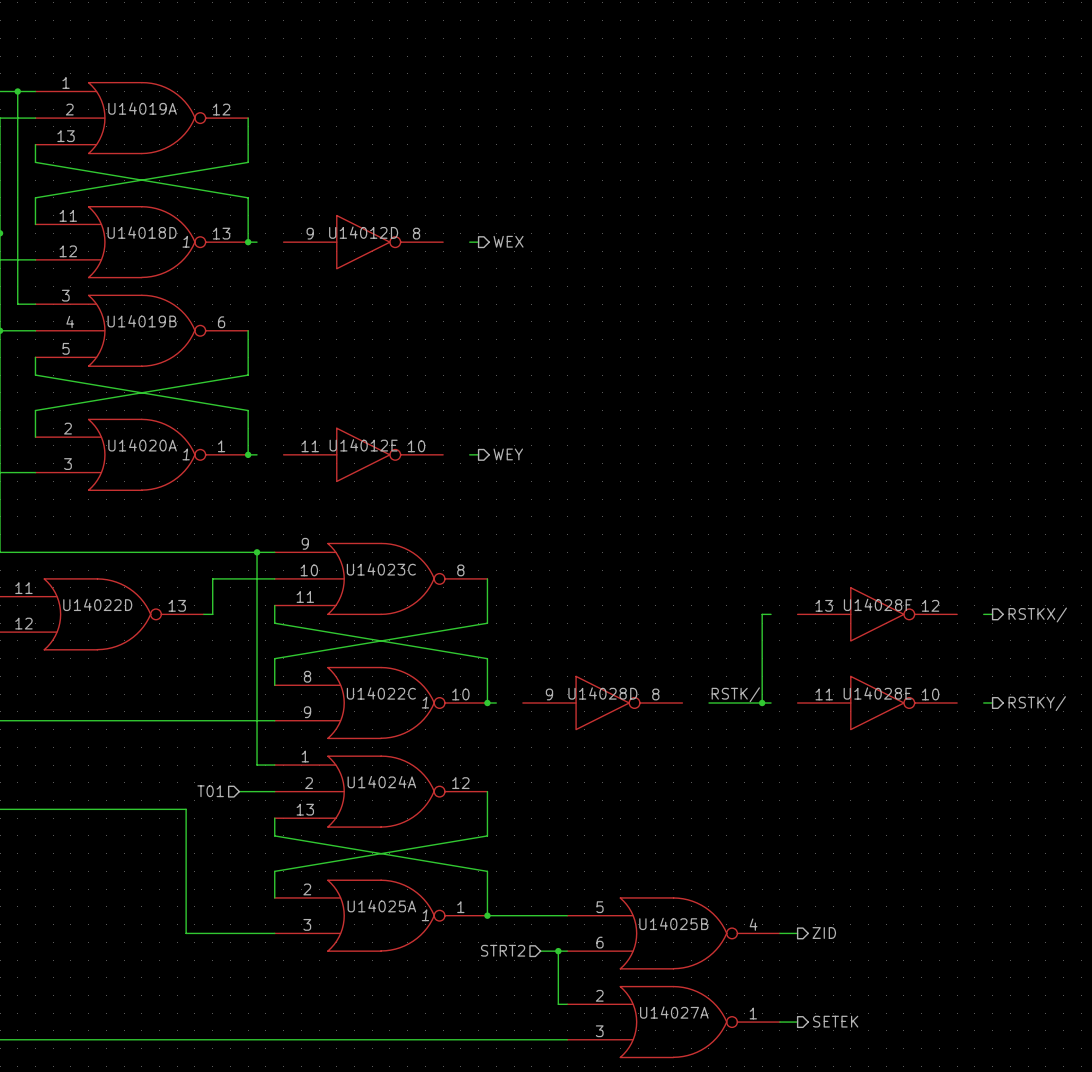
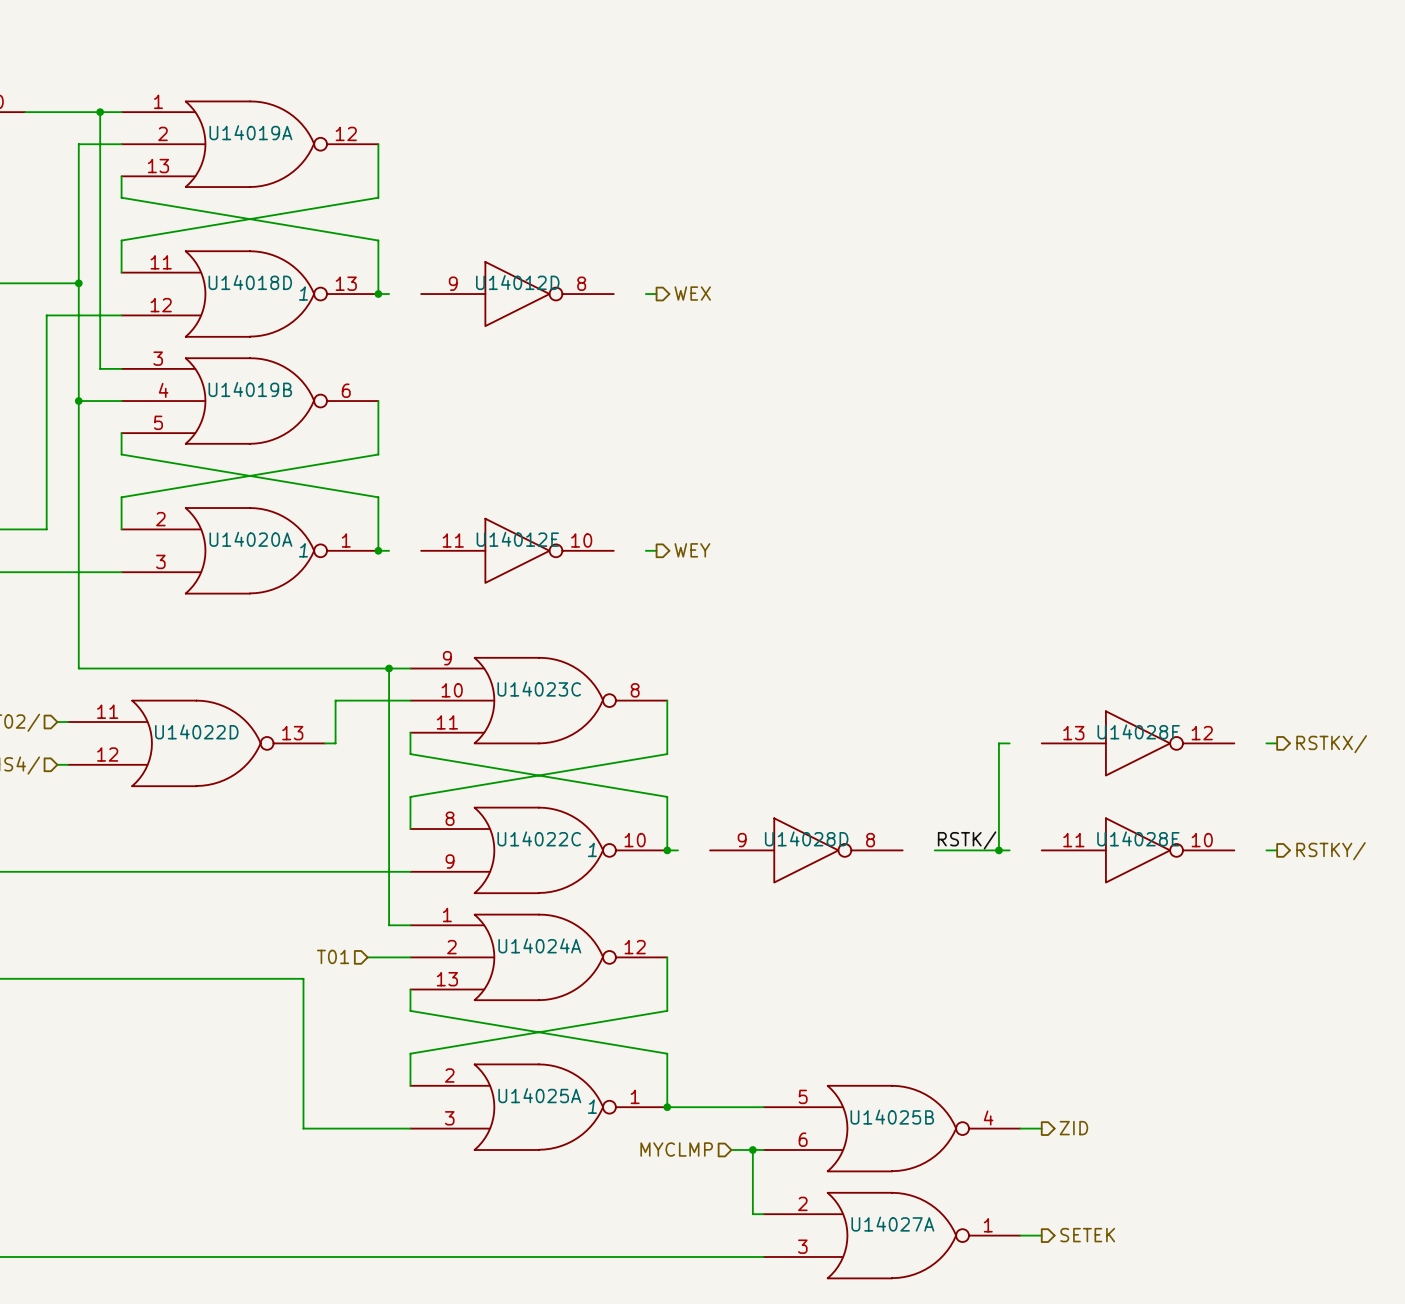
hierarchical label: STRT2 (503, 950) -> MYCLMP (676, 1149)

